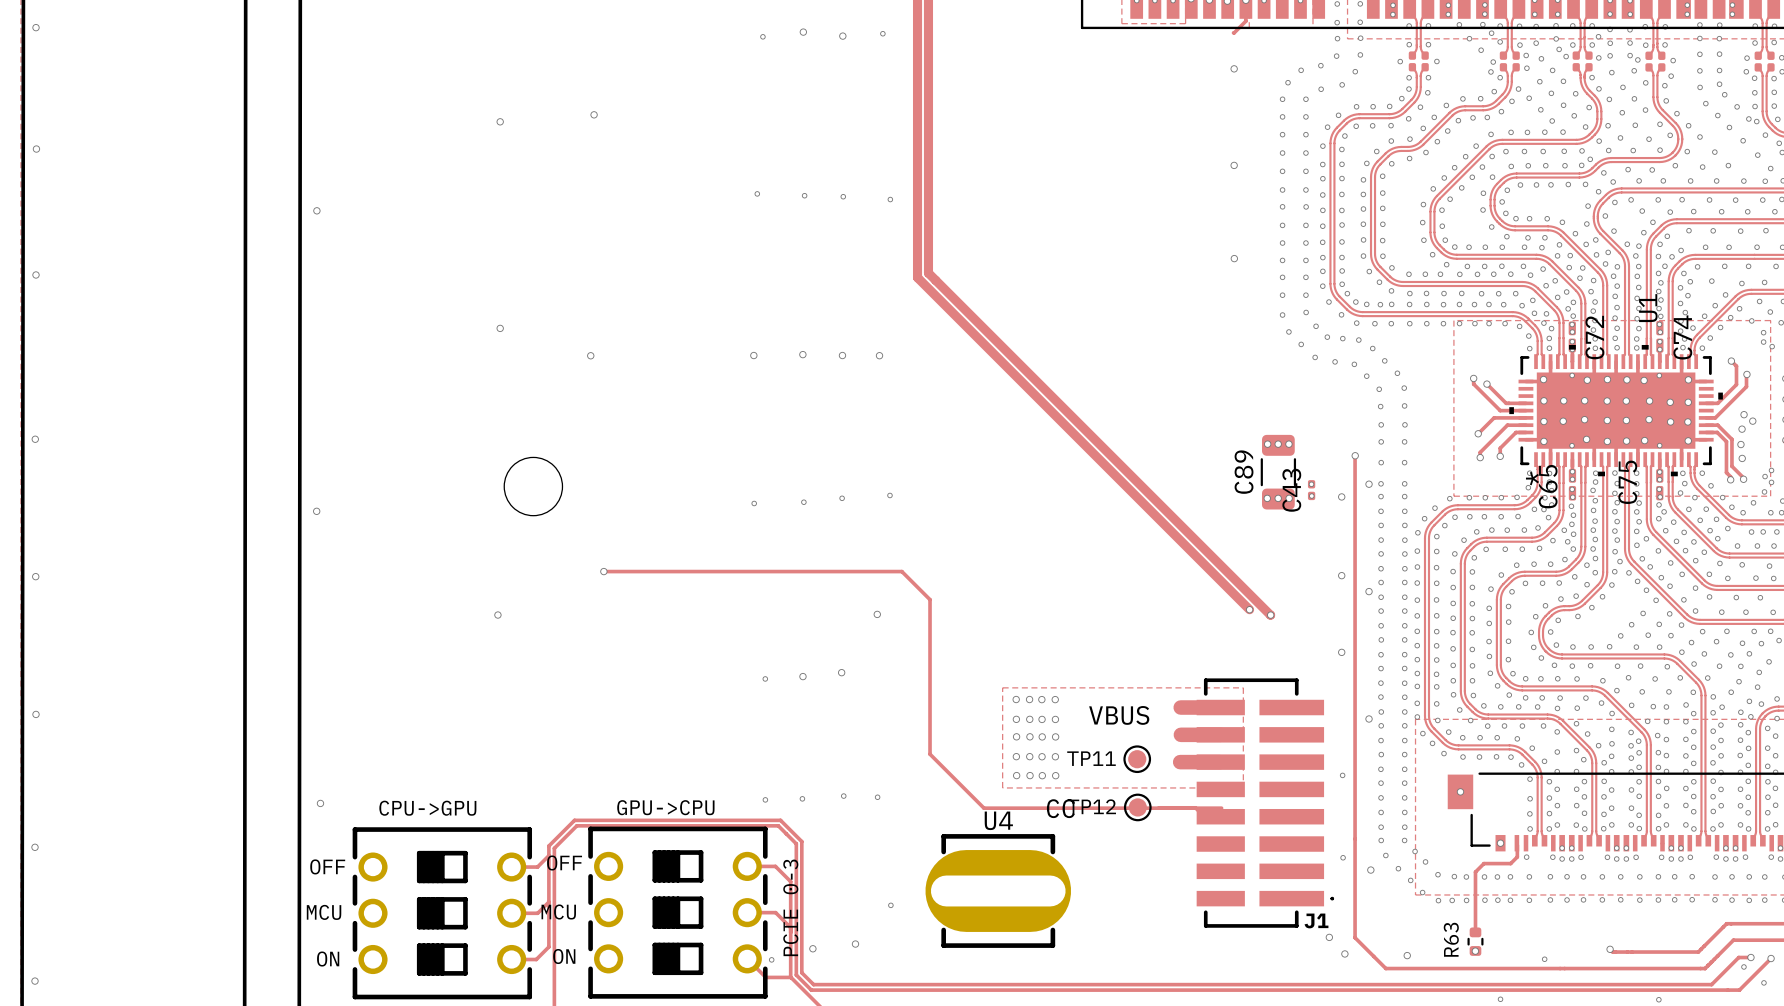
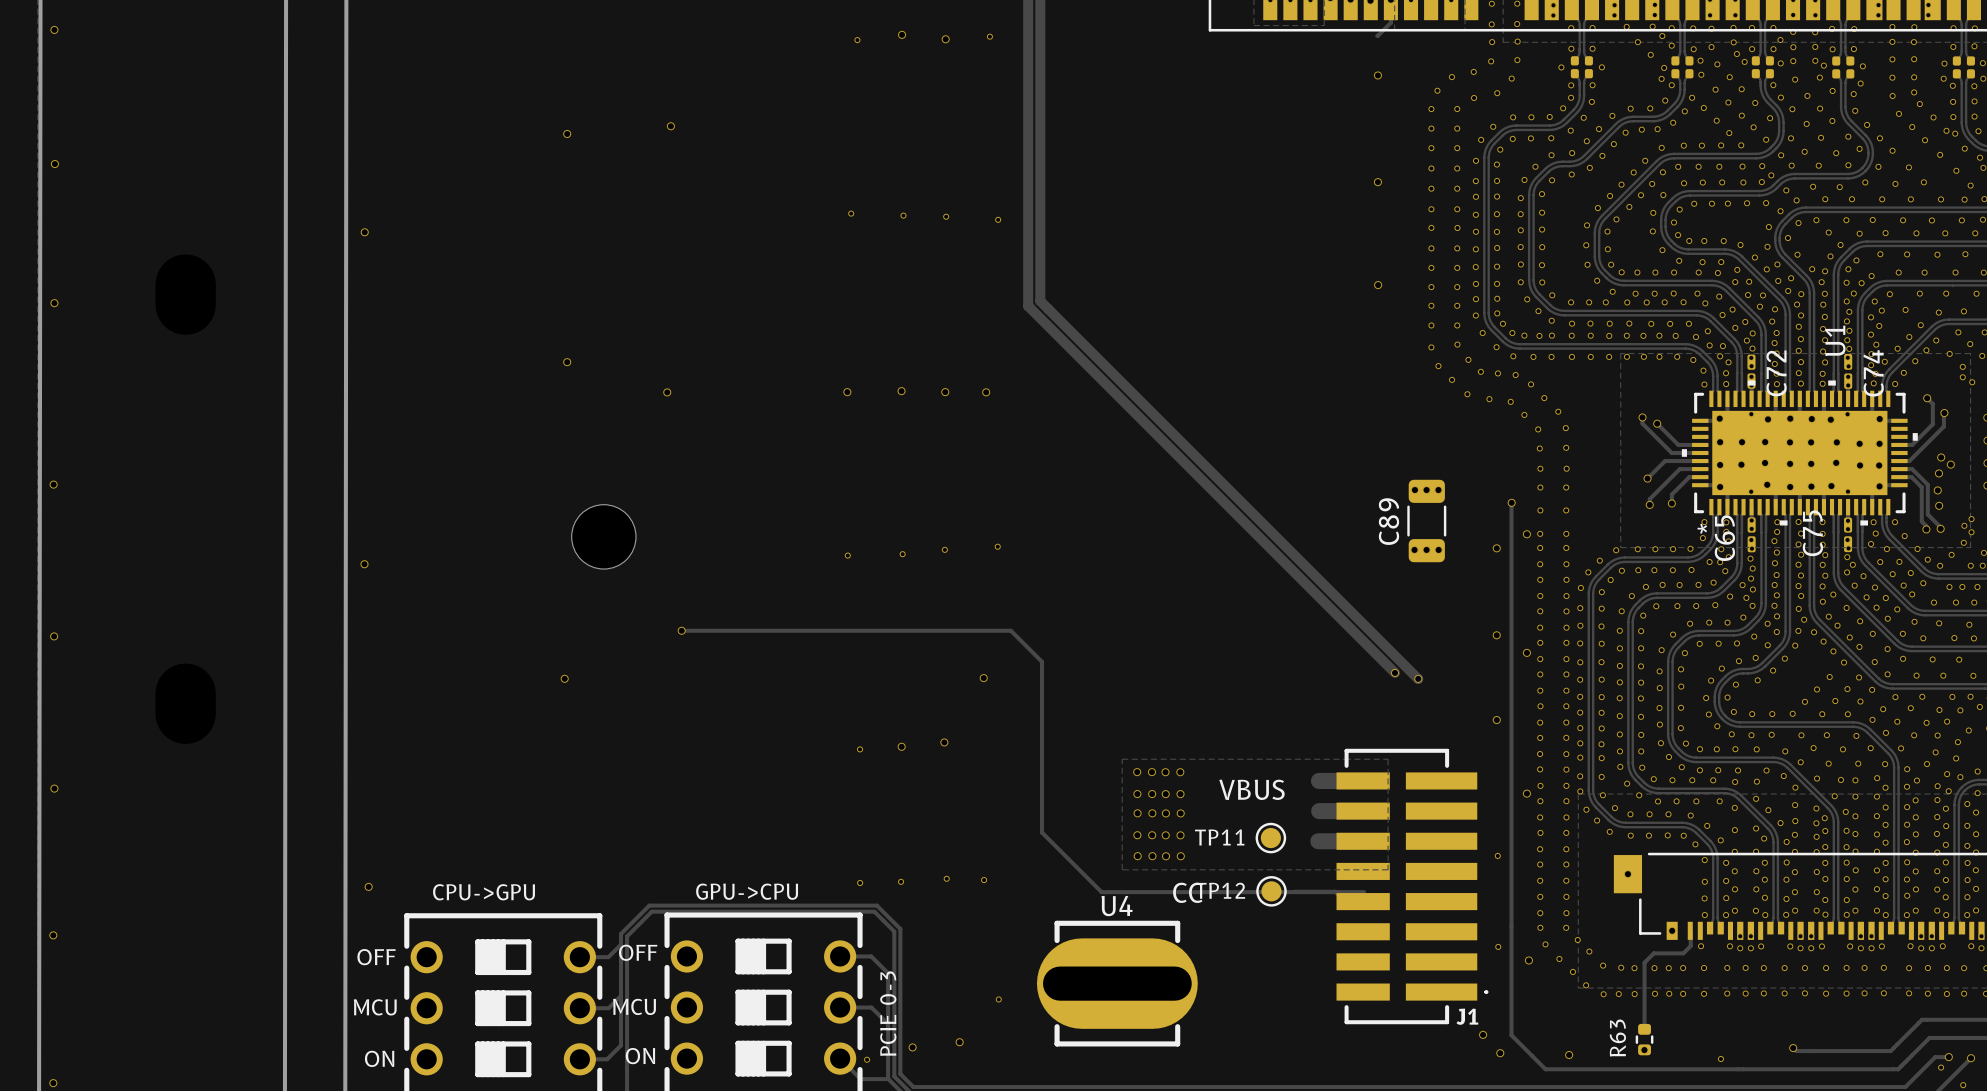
via: (1311, 484) -> none
C43: (1311, 490) -> none
via: (1311, 496) -> none

